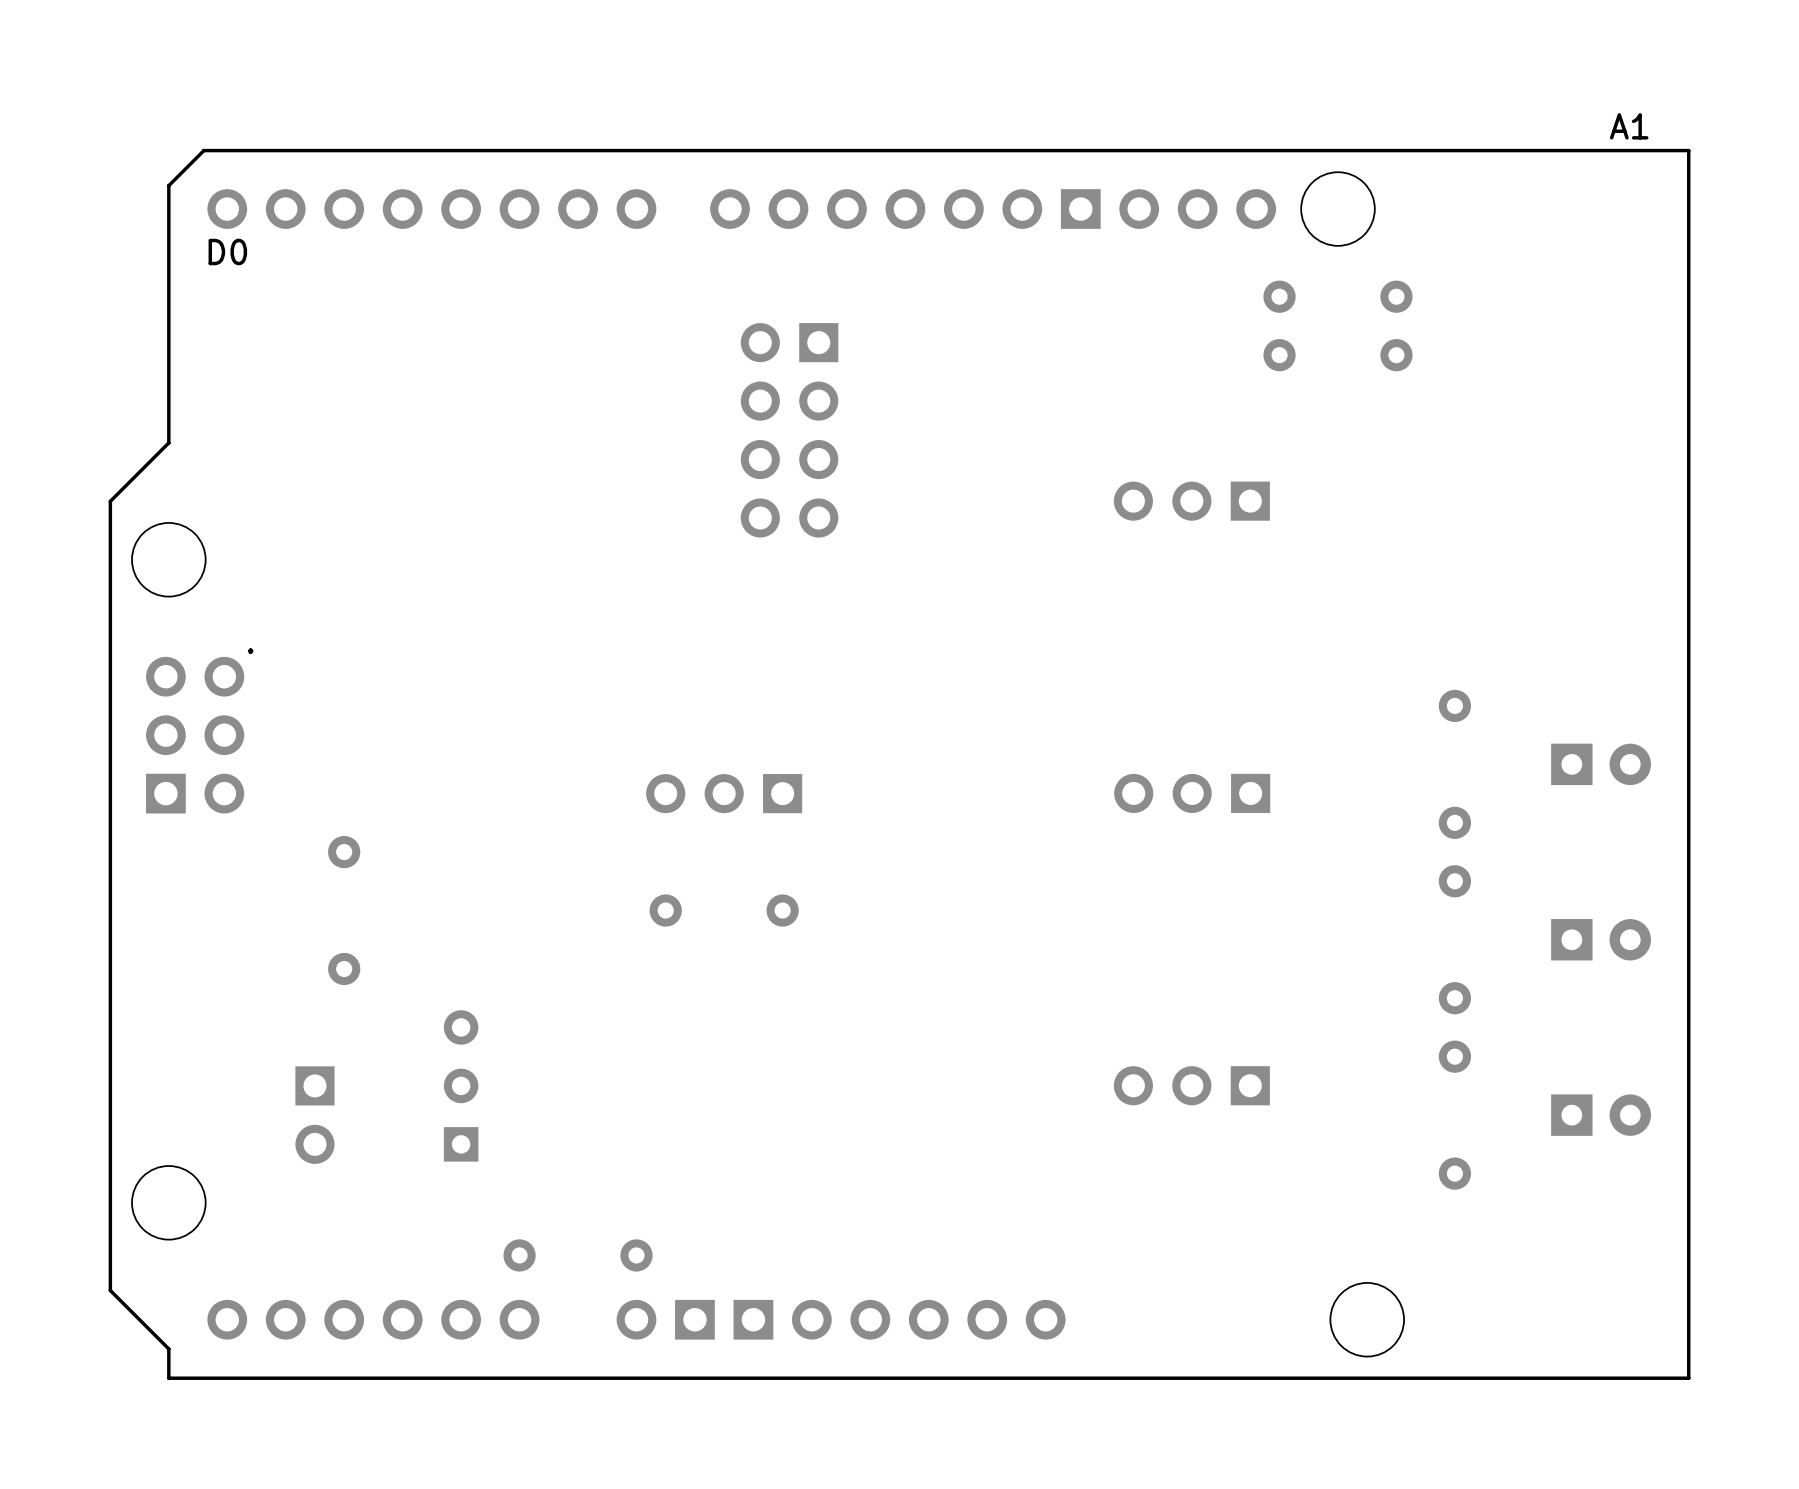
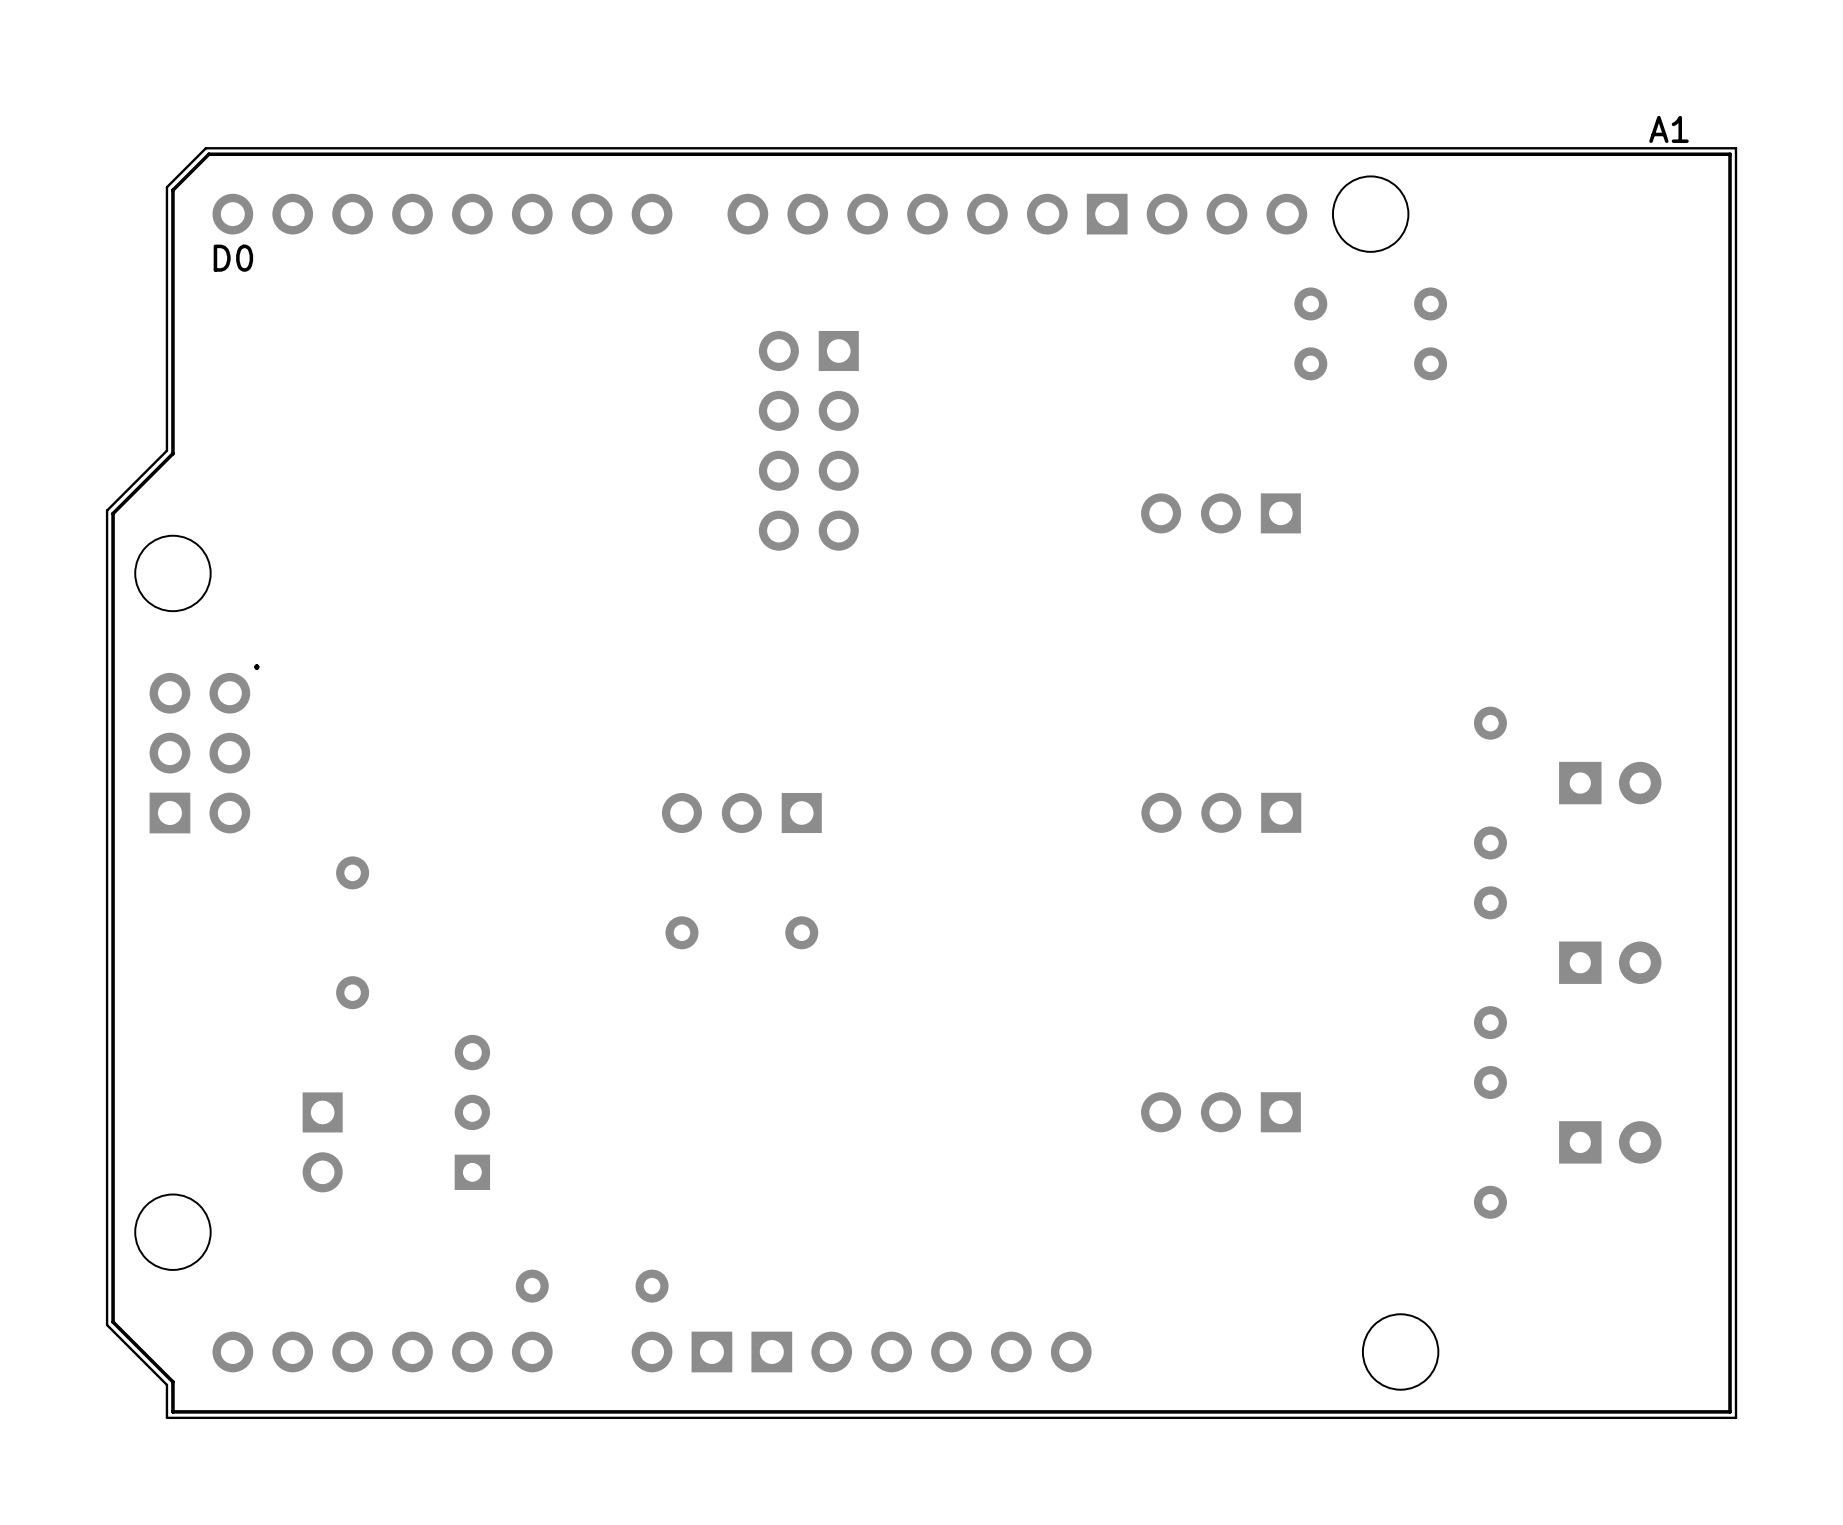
board edge: none -> (1736, 148) (205, 148) (166, 187) (166, 450) (107, 510) (107, 1325) (166, 1384) (166, 1417) (1736, 1417) (1736, 148)
part position: (1601, 764) -> (1610, 783)
part position: (1601, 939) -> (1610, 962)
part position: (1601, 1115) -> (1610, 1142)

